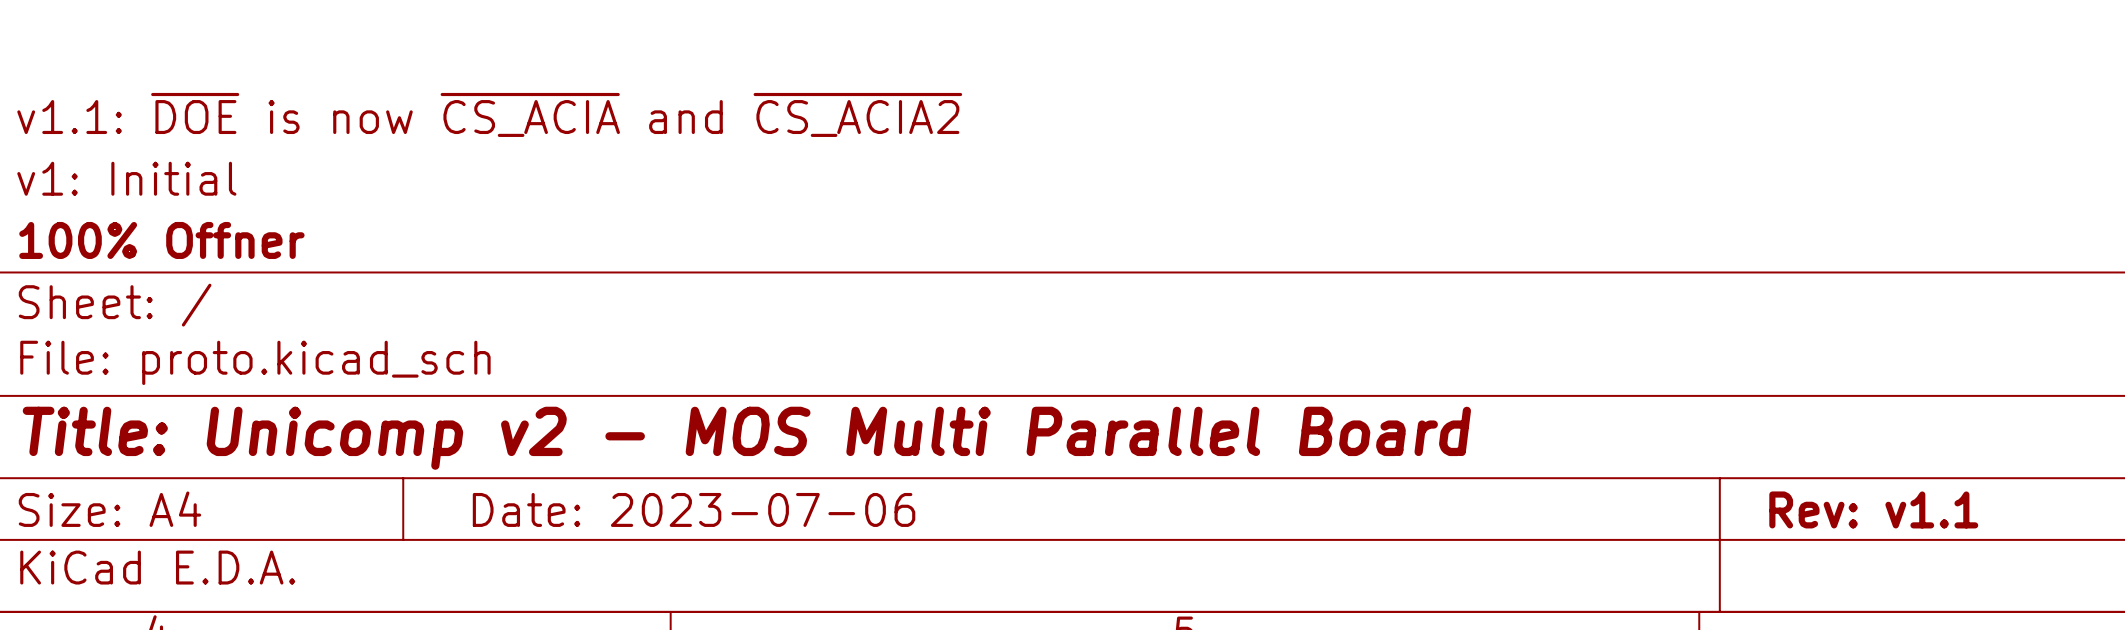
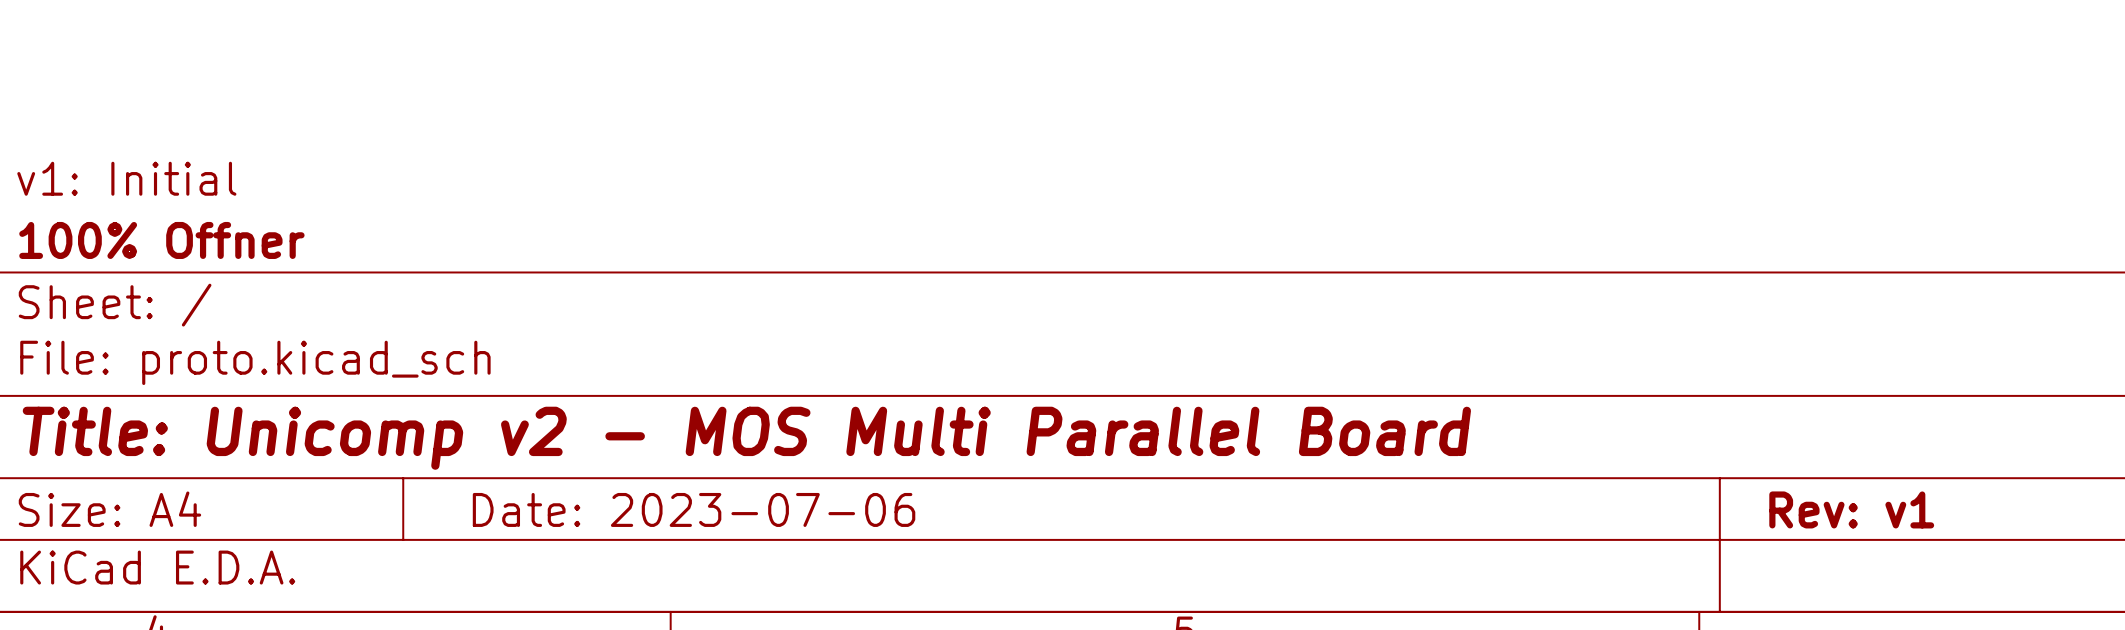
title block: v1.1: ~{DOE} is now ~{CS_ACIA} and ~{CS_ACIA2} (489, 114) -> none
title block: Rev: v1.1 (1873, 509) -> Rev: v1 (1851, 509)

